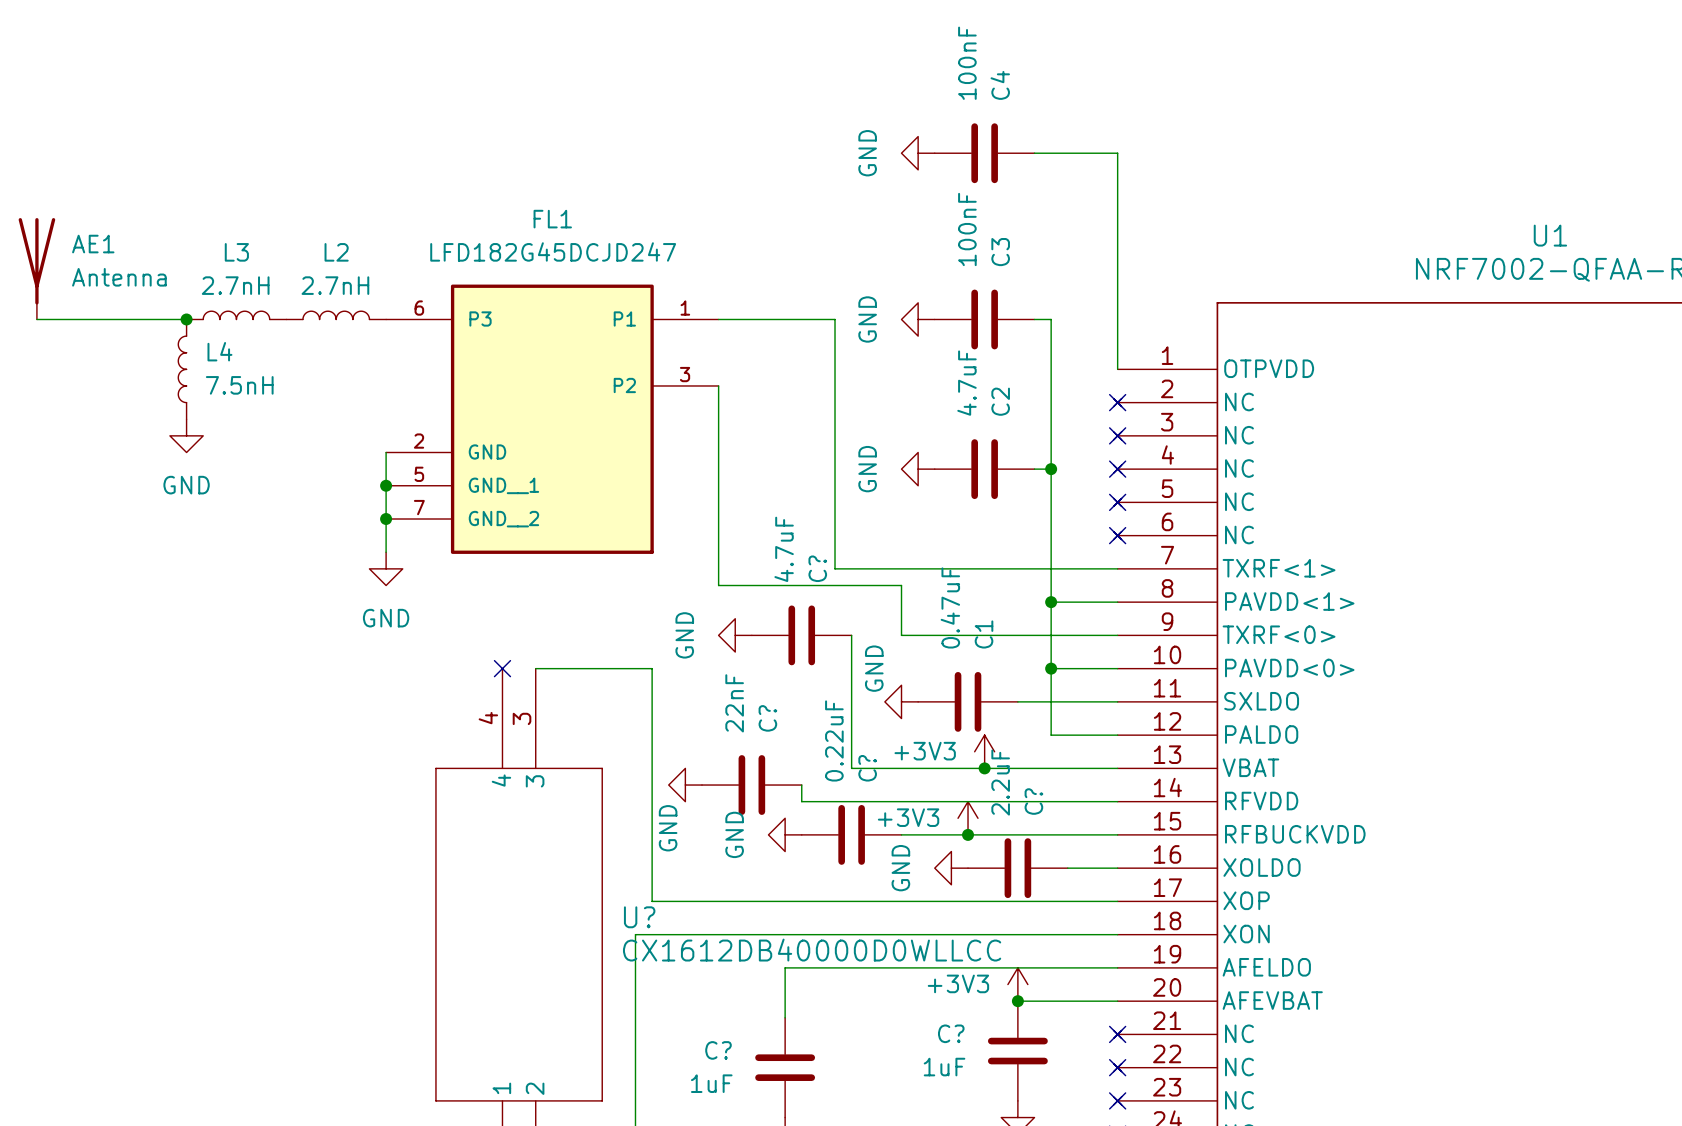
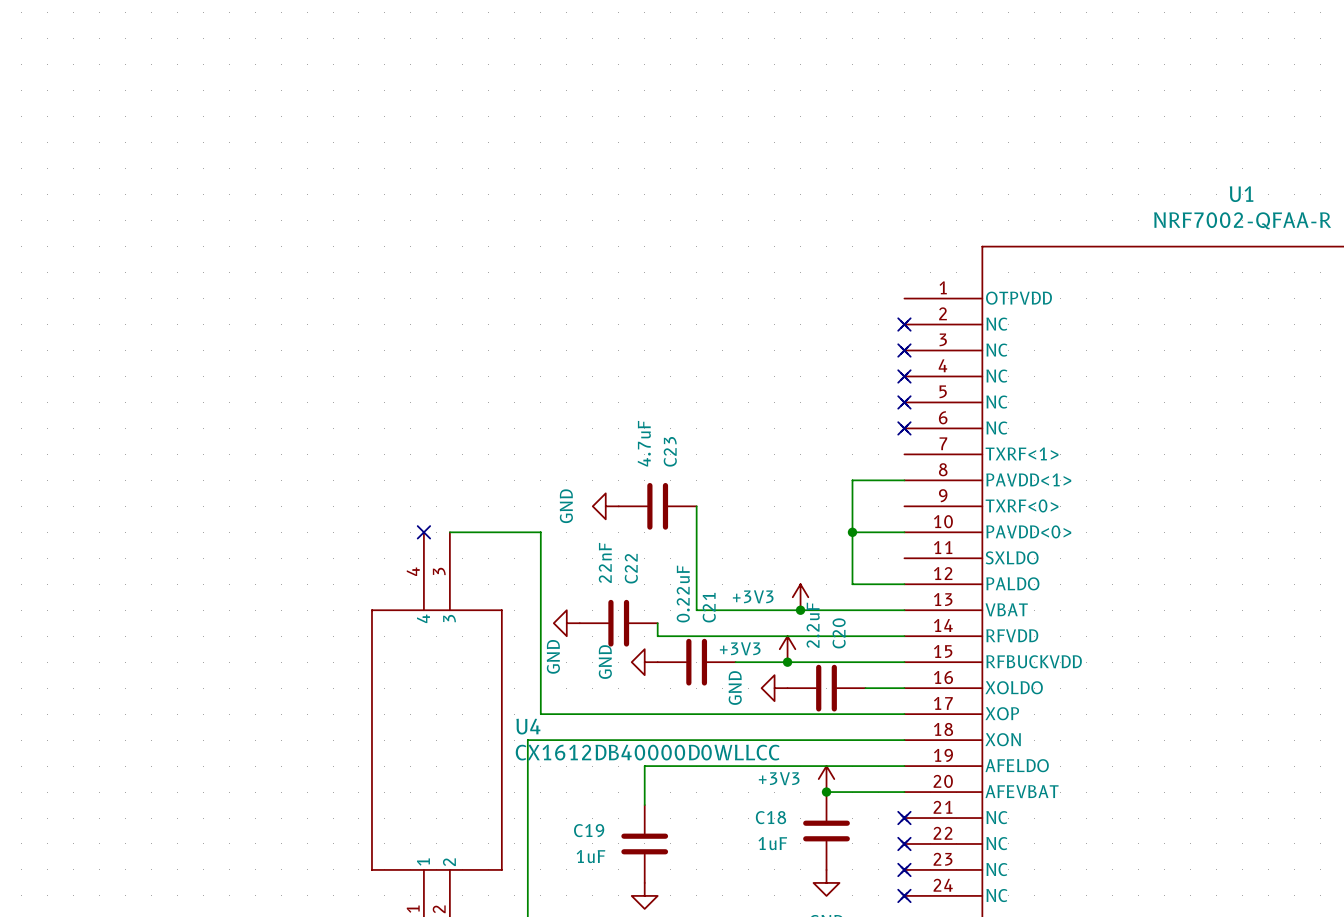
power symbol: GND (918, 153) -> none
C4: 100nF (984, 153) -> none
wire: (1034, 153) (1117, 153) (1117, 369) -> none
AE1: Antenna (36, 268) -> none
L3: 2.7nH (236, 315) -> none
L2: 2.7nH (336, 315) -> none
wire: (36, 319) (186, 319) -> none
junction: (186, 319) -> none
wire: (718, 319) (835, 319) (835, 568) (1117, 568) -> none
power symbol: GND (918, 319) -> none
C3: 100nF (984, 319) -> none
wire: (1034, 319) (1051, 319) (1051, 602) -> none
L4: 7.5nH (182, 369) -> none
wire: (718, 385) (718, 585) (901, 585) (901, 635) (1117, 635) -> none
FL1: LFD182G45DCJD247 (552, 419) -> none
power symbol: GND (186, 435) -> none
wire: (386, 452) (386, 552) -> none
power symbol: GND (918, 469) -> none
C2: 4.7uF (984, 469) -> none
wire: (1034, 469) (1051, 469) -> none
junction: (1051, 469) -> none
junction: (386, 485) -> none
junction: (386, 519) -> none
power symbol: GND (386, 568) -> none
C? name: C? (817, 568) -> C23 (670, 451)
junction: (1051, 602) -> none
power symbol: GND (901, 701) -> none
C1: 0.47uF (968, 701) -> none
wire: (1017, 701) (1117, 701) -> none
C? name: C? (767, 718) -> C22 (631, 568)
C? name: C? (867, 768) -> C21 (709, 607)
C? name: C? (1033, 801) -> C20 (839, 633)
U? name: U? (639, 917) -> U4 (528, 726)
C? name: C? (951, 1033) -> C18 (770, 817)
C? name: C? (718, 1050) -> C19 (589, 830)

